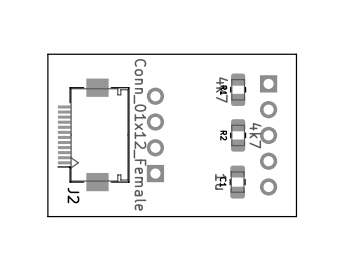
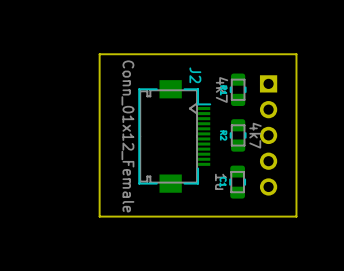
board edge: (99, 54) (47, 54) (47, 216) (99, 216) -> (99, 54) (99, 216)
J2 rotation: 0° (93, 134) -> 180° (174, 136)
J2 position: (93, 134) -> (174, 136)
part: (155, 134) -> none

